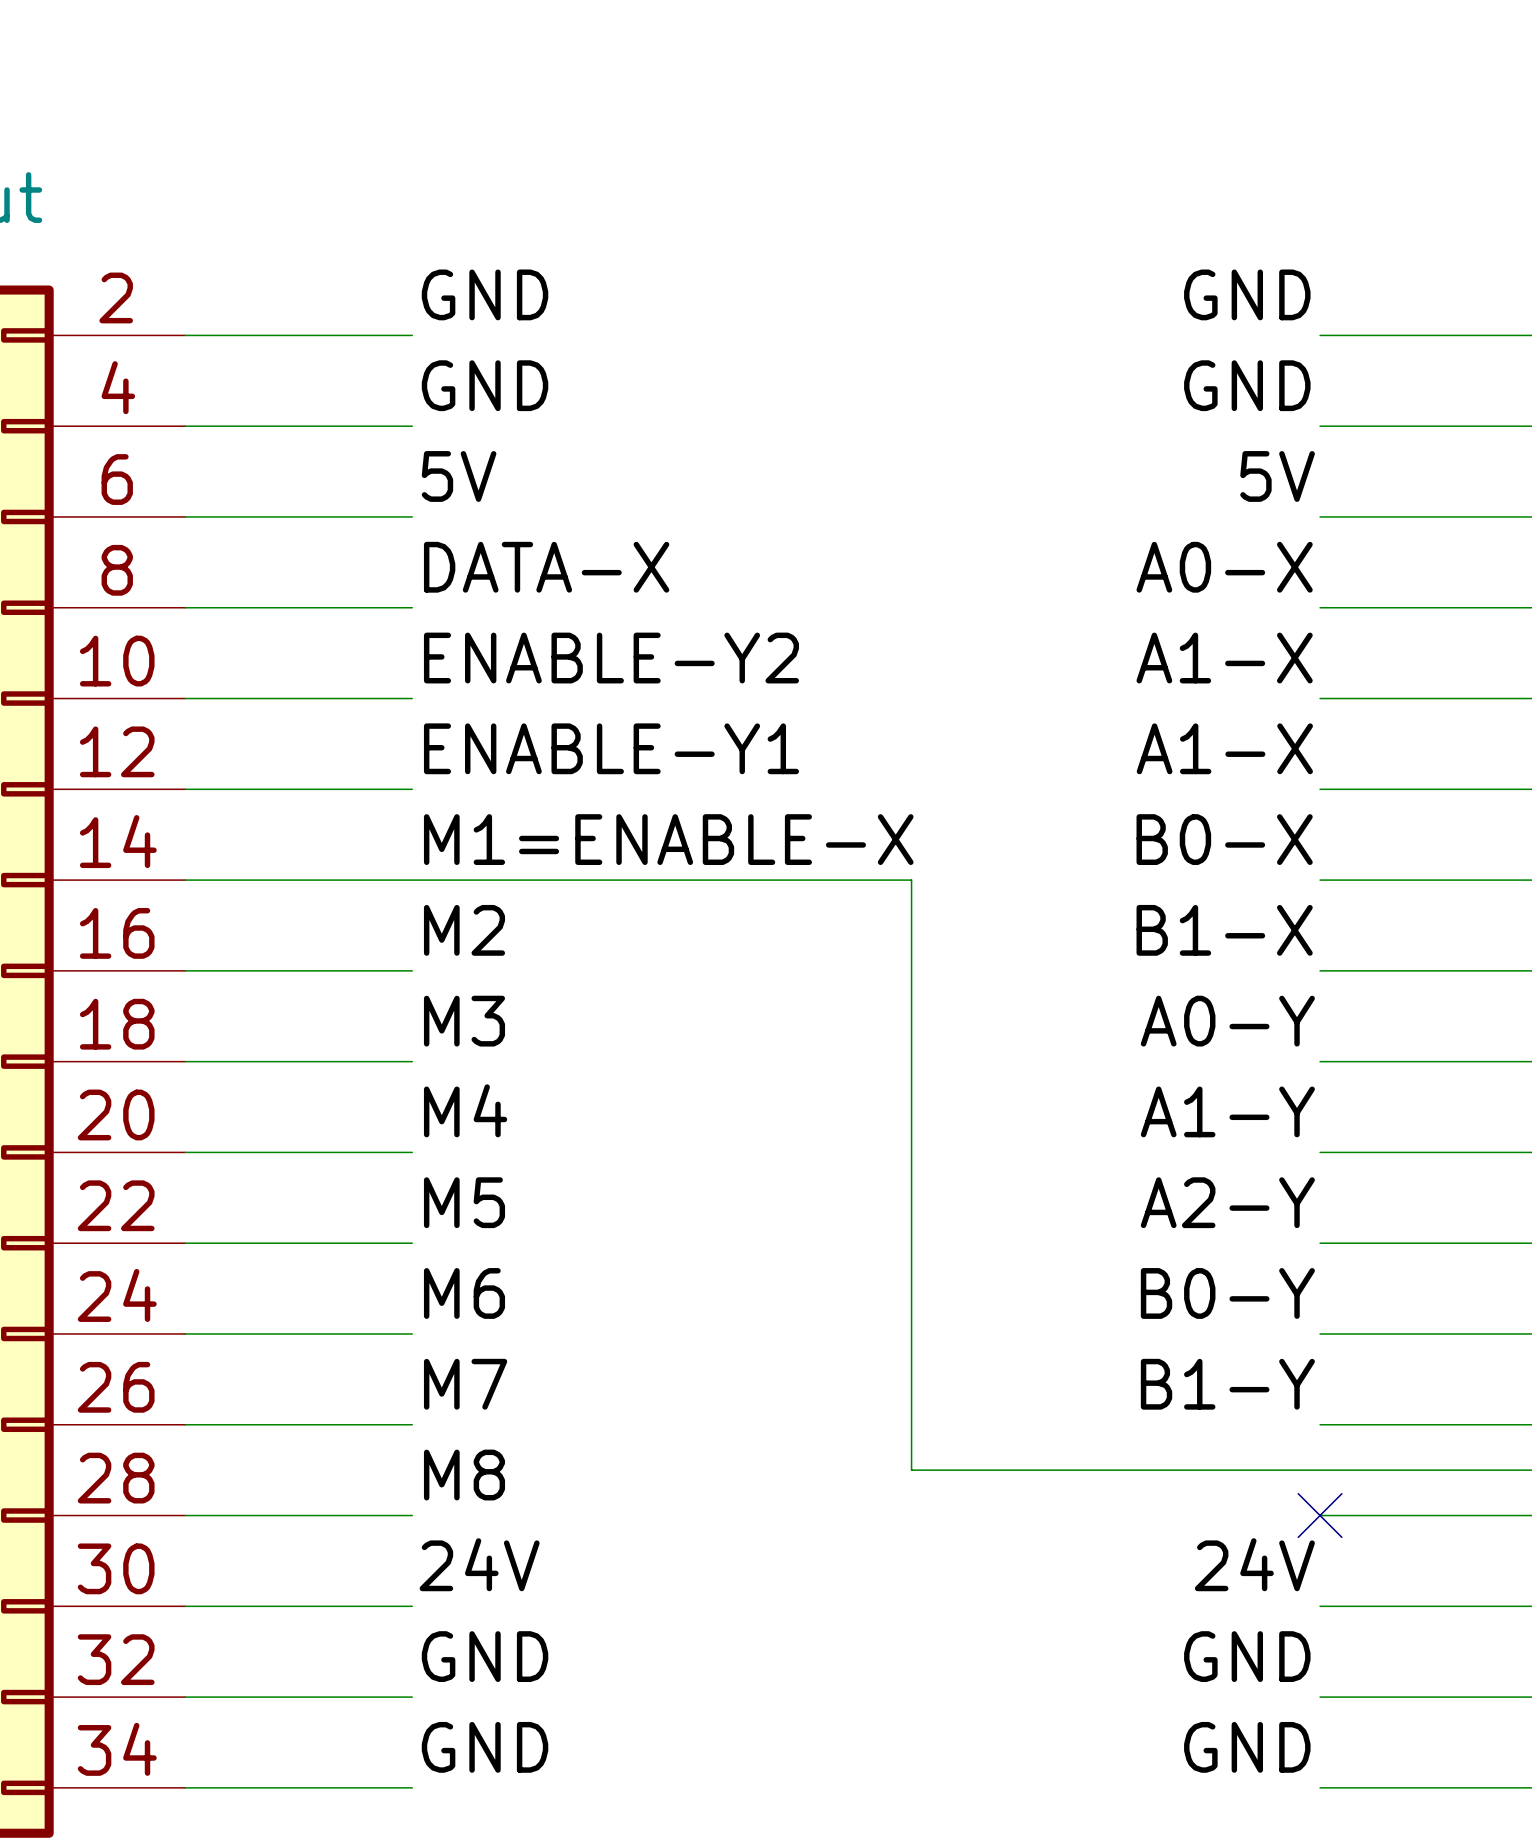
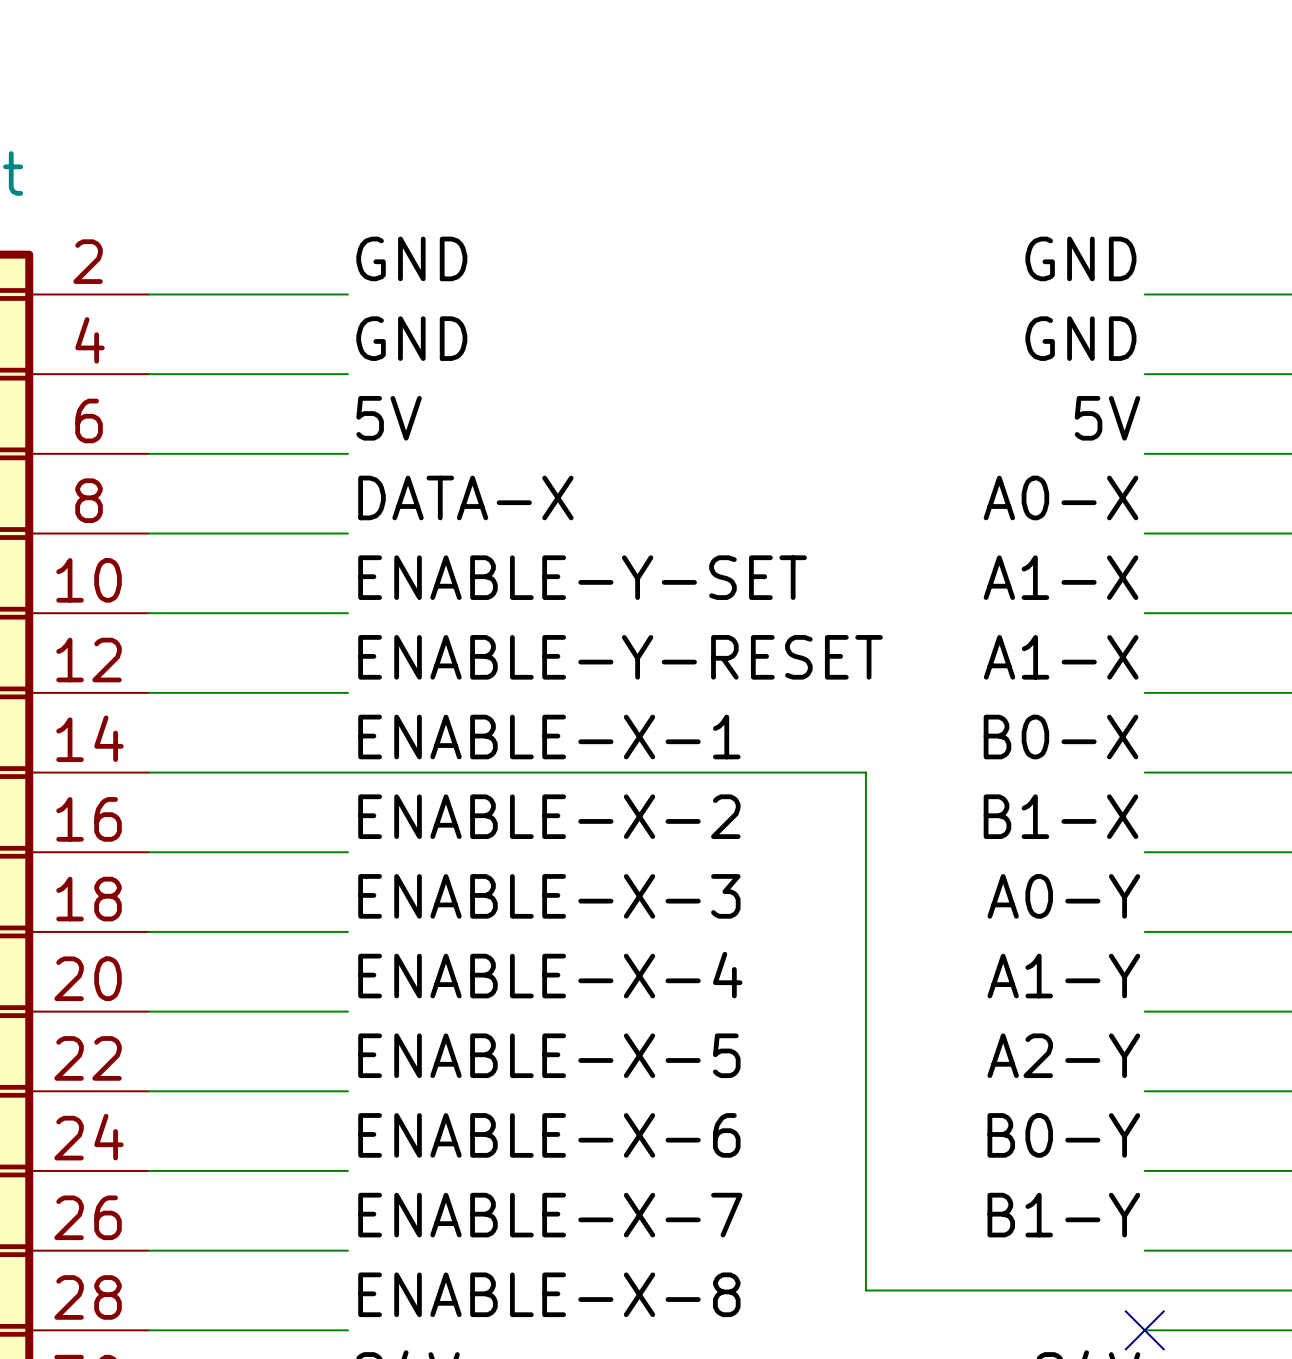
label: ENABLE-Y2 (611, 658) -> ENABLE-Y-SET (582, 577)
label: ENABLE-Y1 (611, 748) -> ENABLE-Y-RESET (620, 657)
label: M1=ENABLE-X (668, 839) -> ENABLE-X-1 (549, 737)
wire: (911, 880) (911, 1470) (1002, 1470) -> (786, 772) (865, 772) (865, 1290)
label: M2 (464, 930) -> ENABLE-X-2 (549, 816)
label: M3 (464, 1021) -> ENABLE-X-3 (549, 896)
label: M4 (465, 1110) -> ENABLE-X-4 (550, 975)
label: M5 (464, 1202) -> ENABLE-X-5 (549, 1055)
label: M6 (464, 1293) -> ENABLE-X-6 (549, 1135)
label: M7 (465, 1384) -> ENABLE-X-7 (550, 1215)
label: M8 (464, 1475) -> ENABLE-X-8 (549, 1294)

